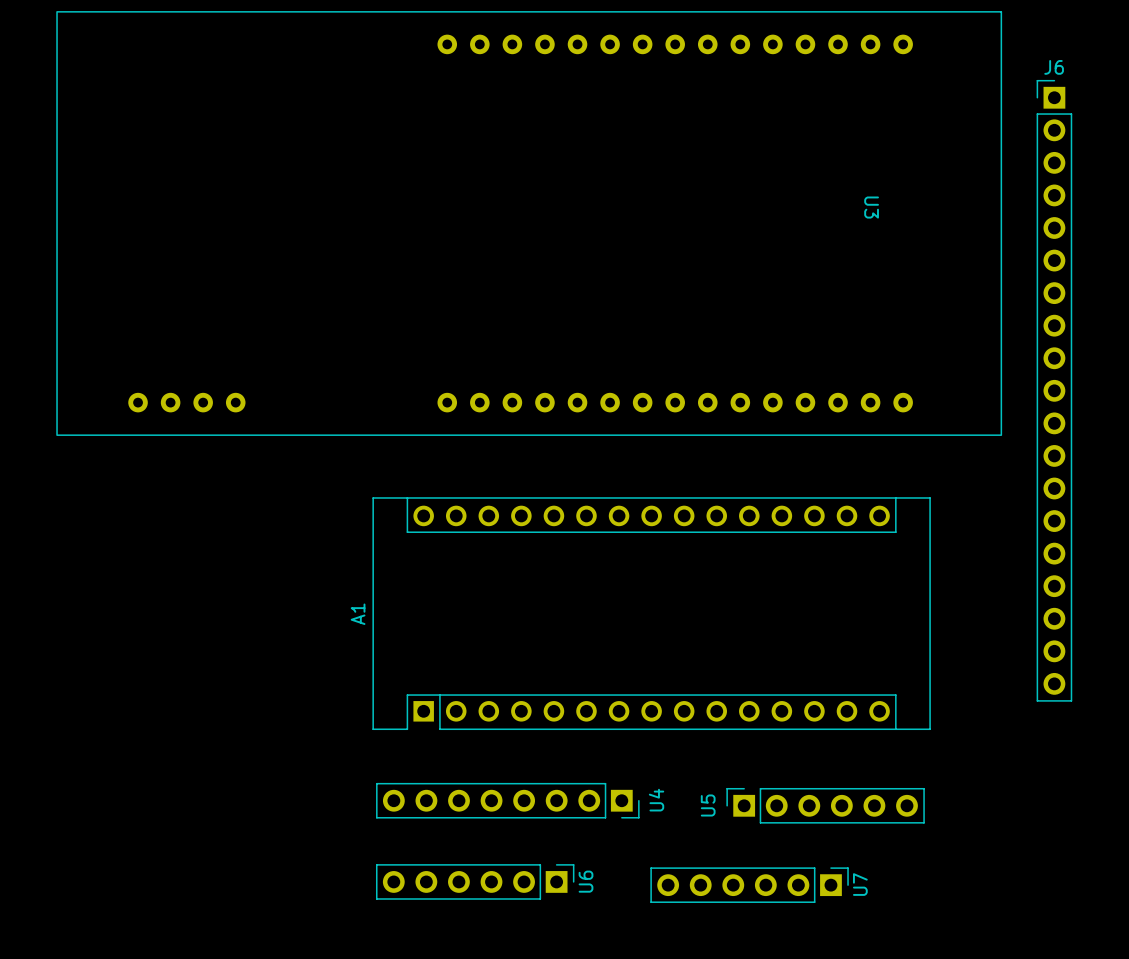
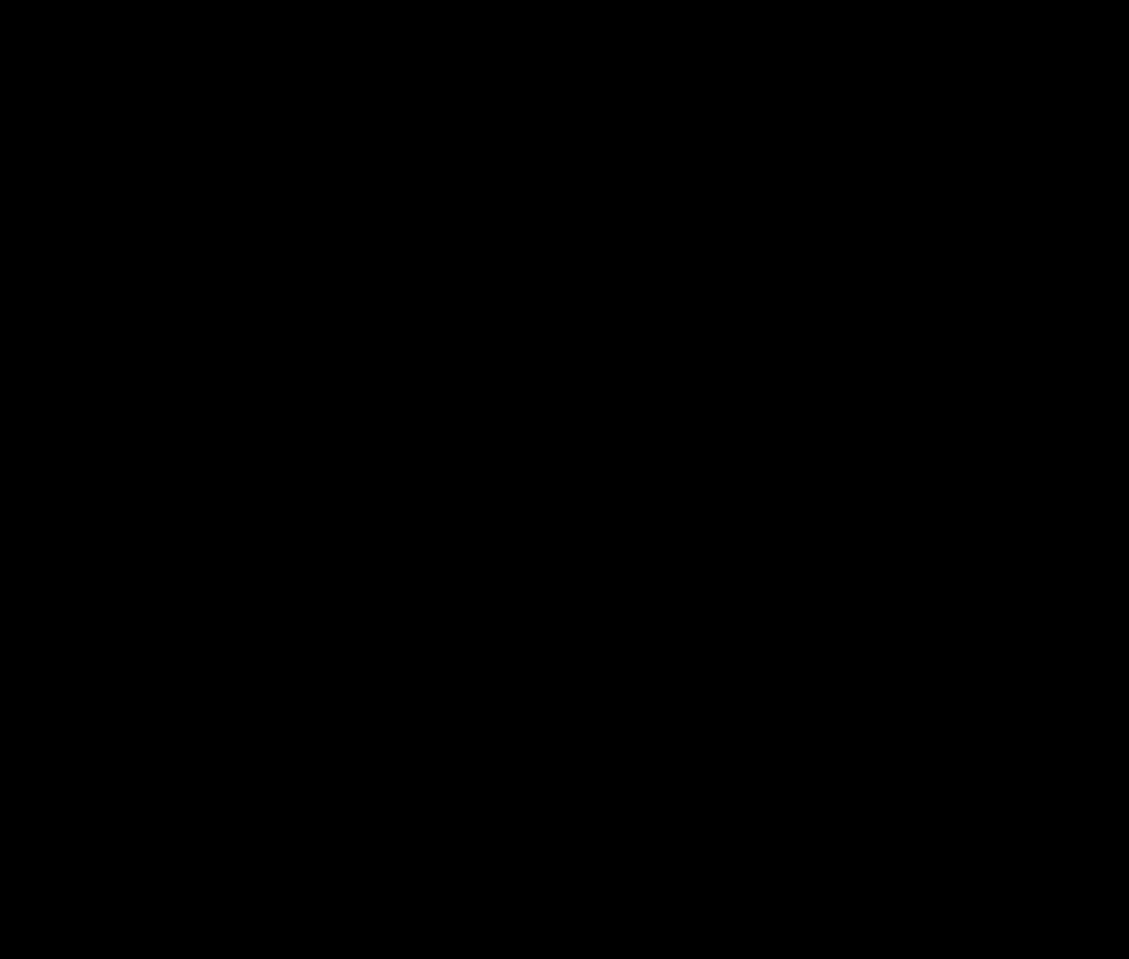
U3: (529, 223) -> none
J6: (1054, 390) -> none
A1: (651, 613) -> none
U4: (507, 800) -> none
U5: (825, 805) -> none
U6: (475, 881) -> none
U7: (749, 885) -> none

